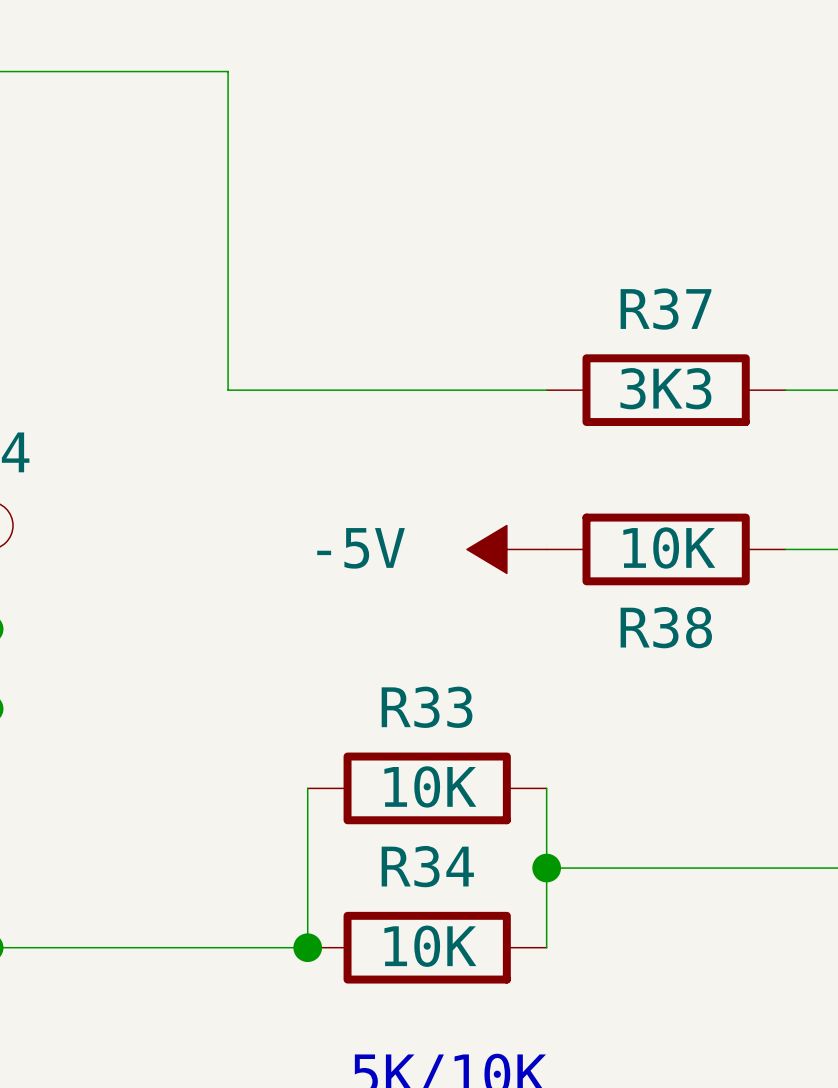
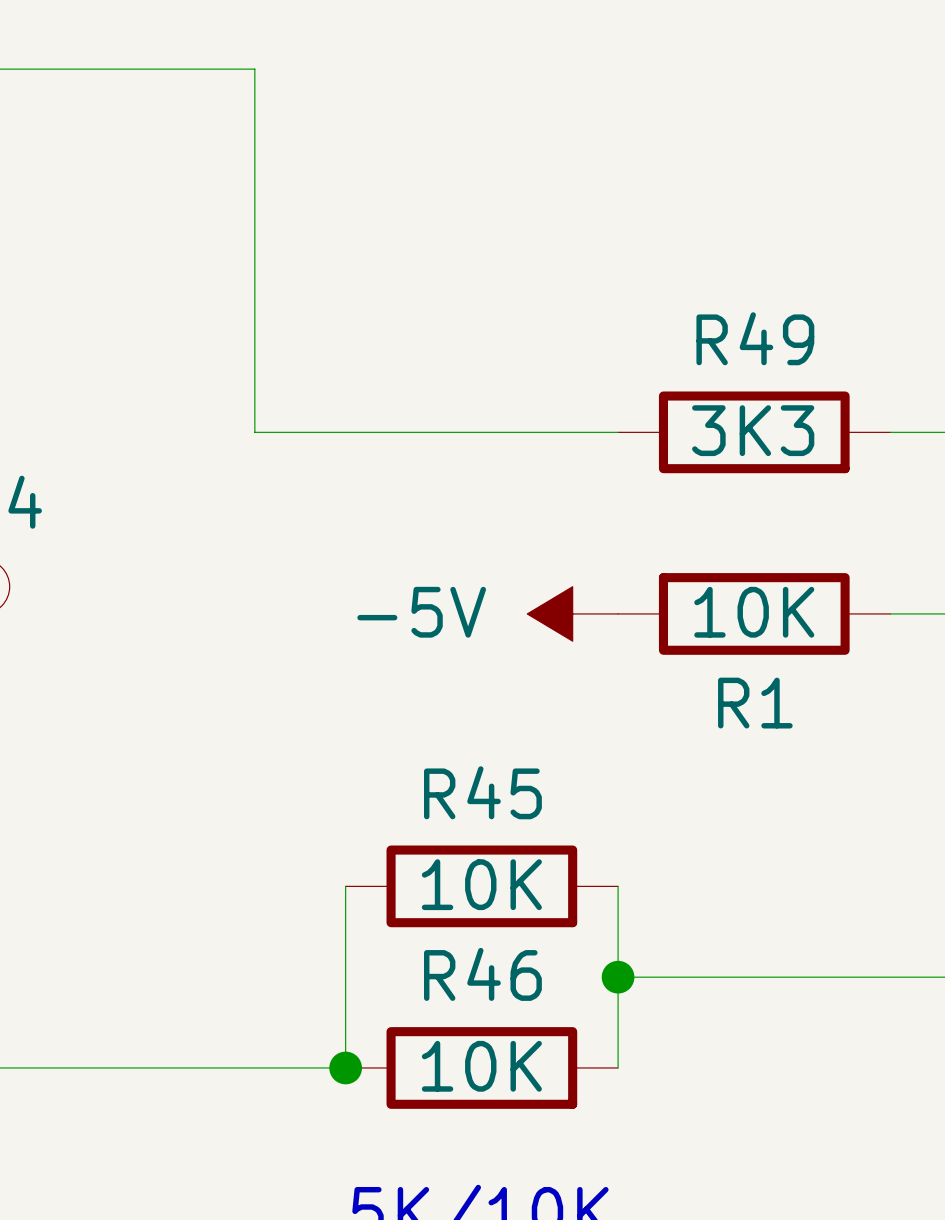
R37 name: R37 (665, 309) -> R49 (755, 338)
R38 name: R38 (666, 627) -> R1 (755, 703)
R33 name: R33 (427, 707) -> R45 (482, 792)
R34 name: R34 (427, 866) -> R46 (482, 974)

